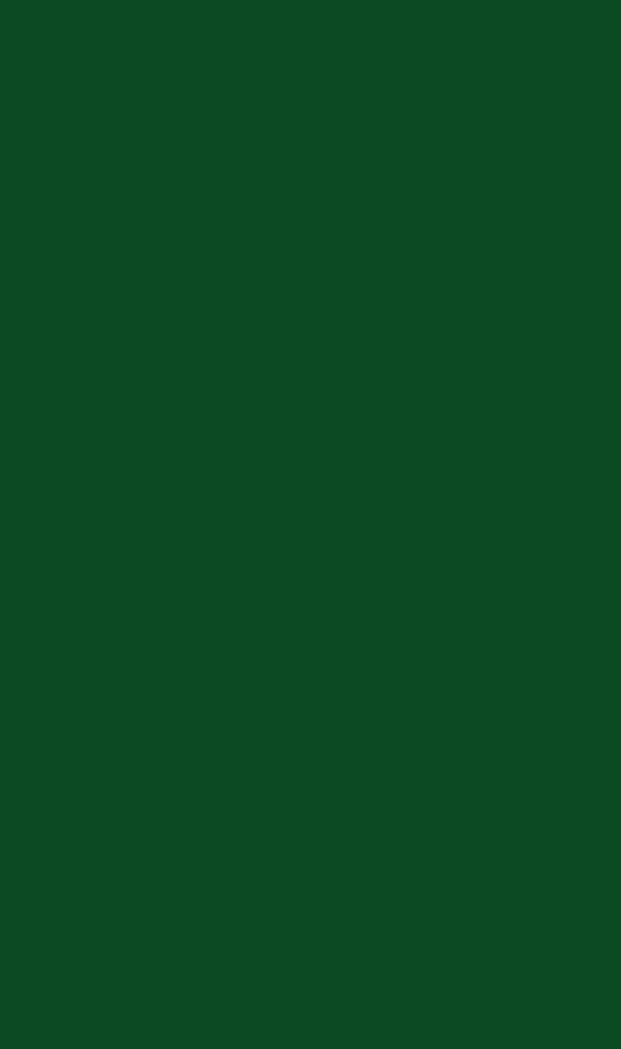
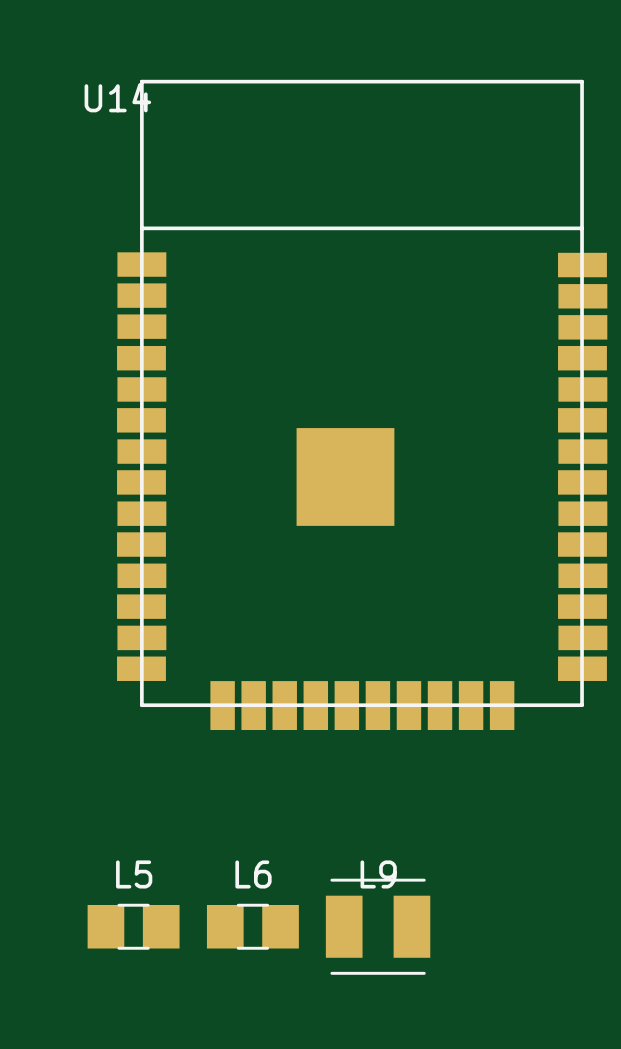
U14: none -> (362, 404)
L5: none -> (133, 926)
L6: none -> (252, 926)
L9: none -> (378, 926)

